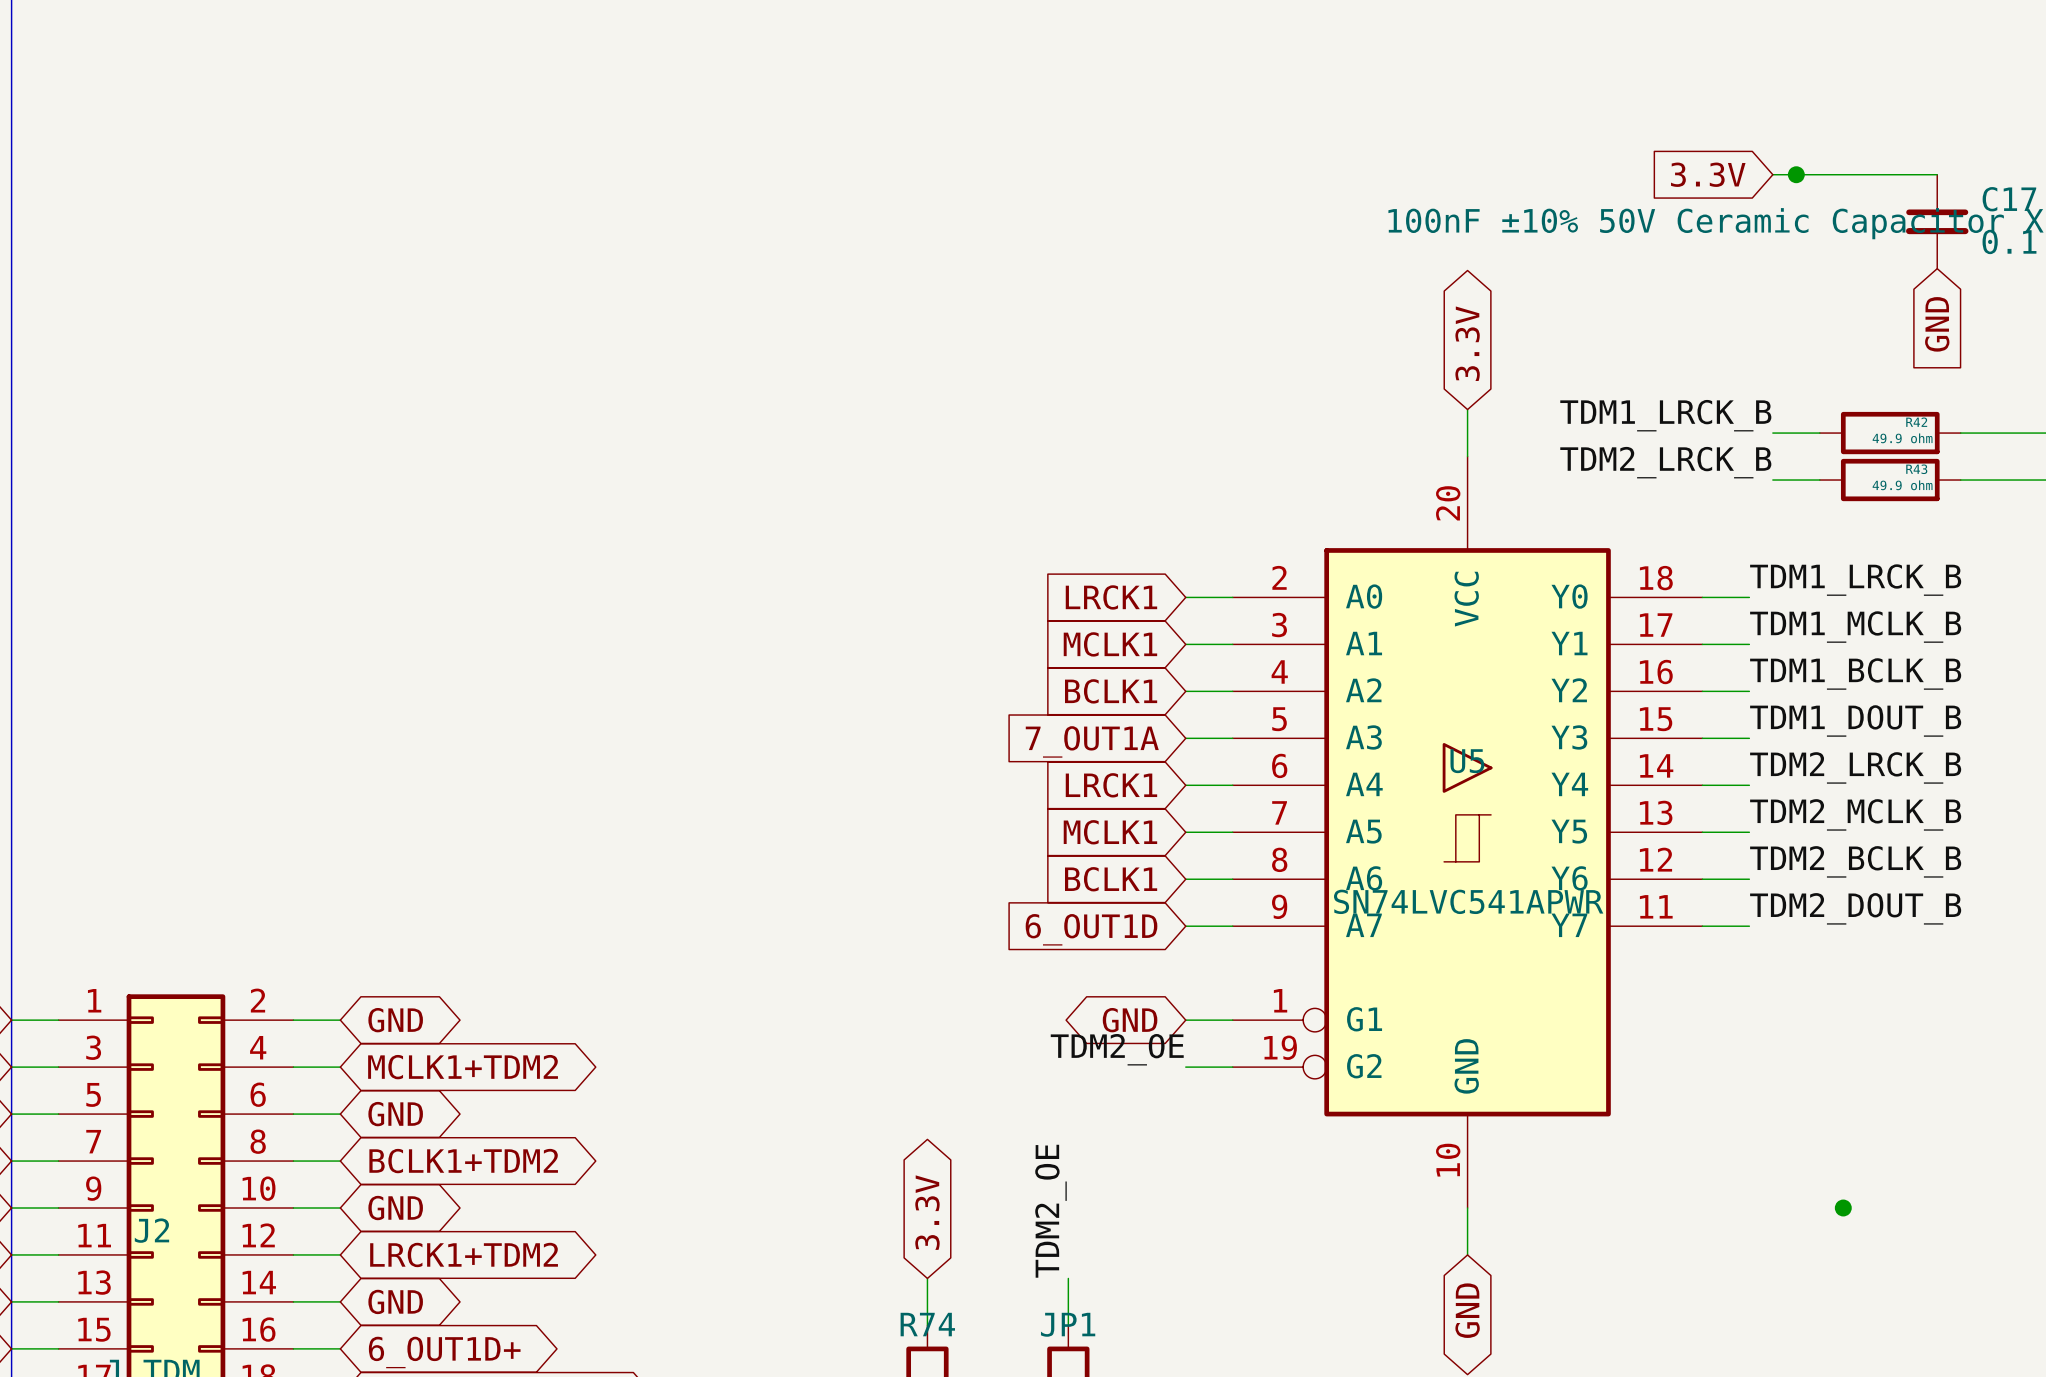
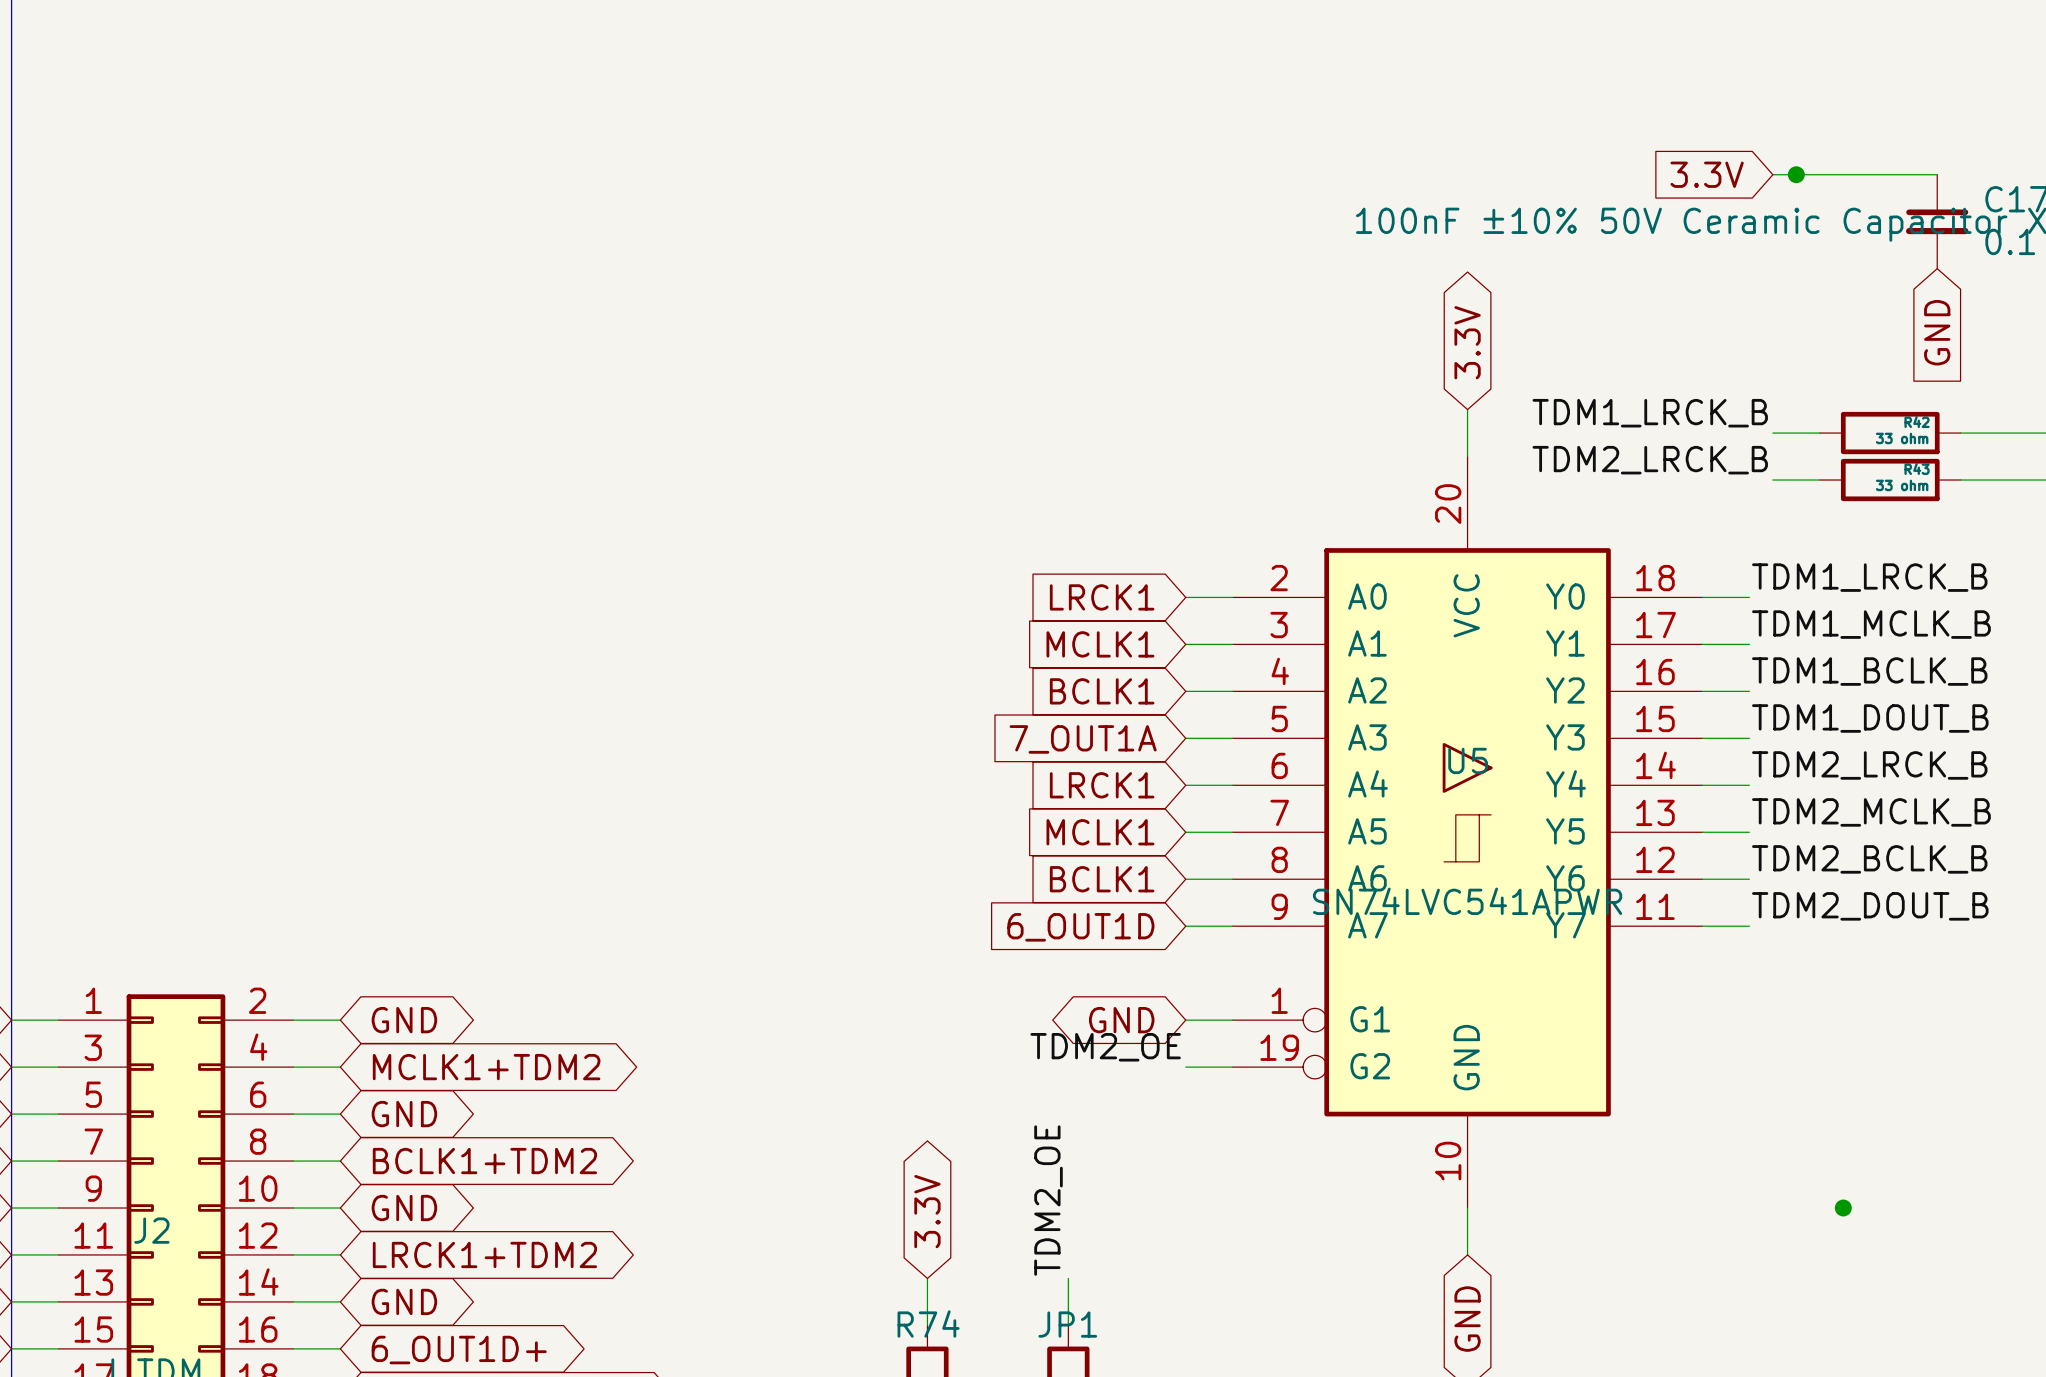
R42 value: 49.9 ohm (1902, 438) -> 33 ohm (1902, 438)
R43 value: 49.9 ohm (1902, 485) -> 33 ohm (1902, 485)

